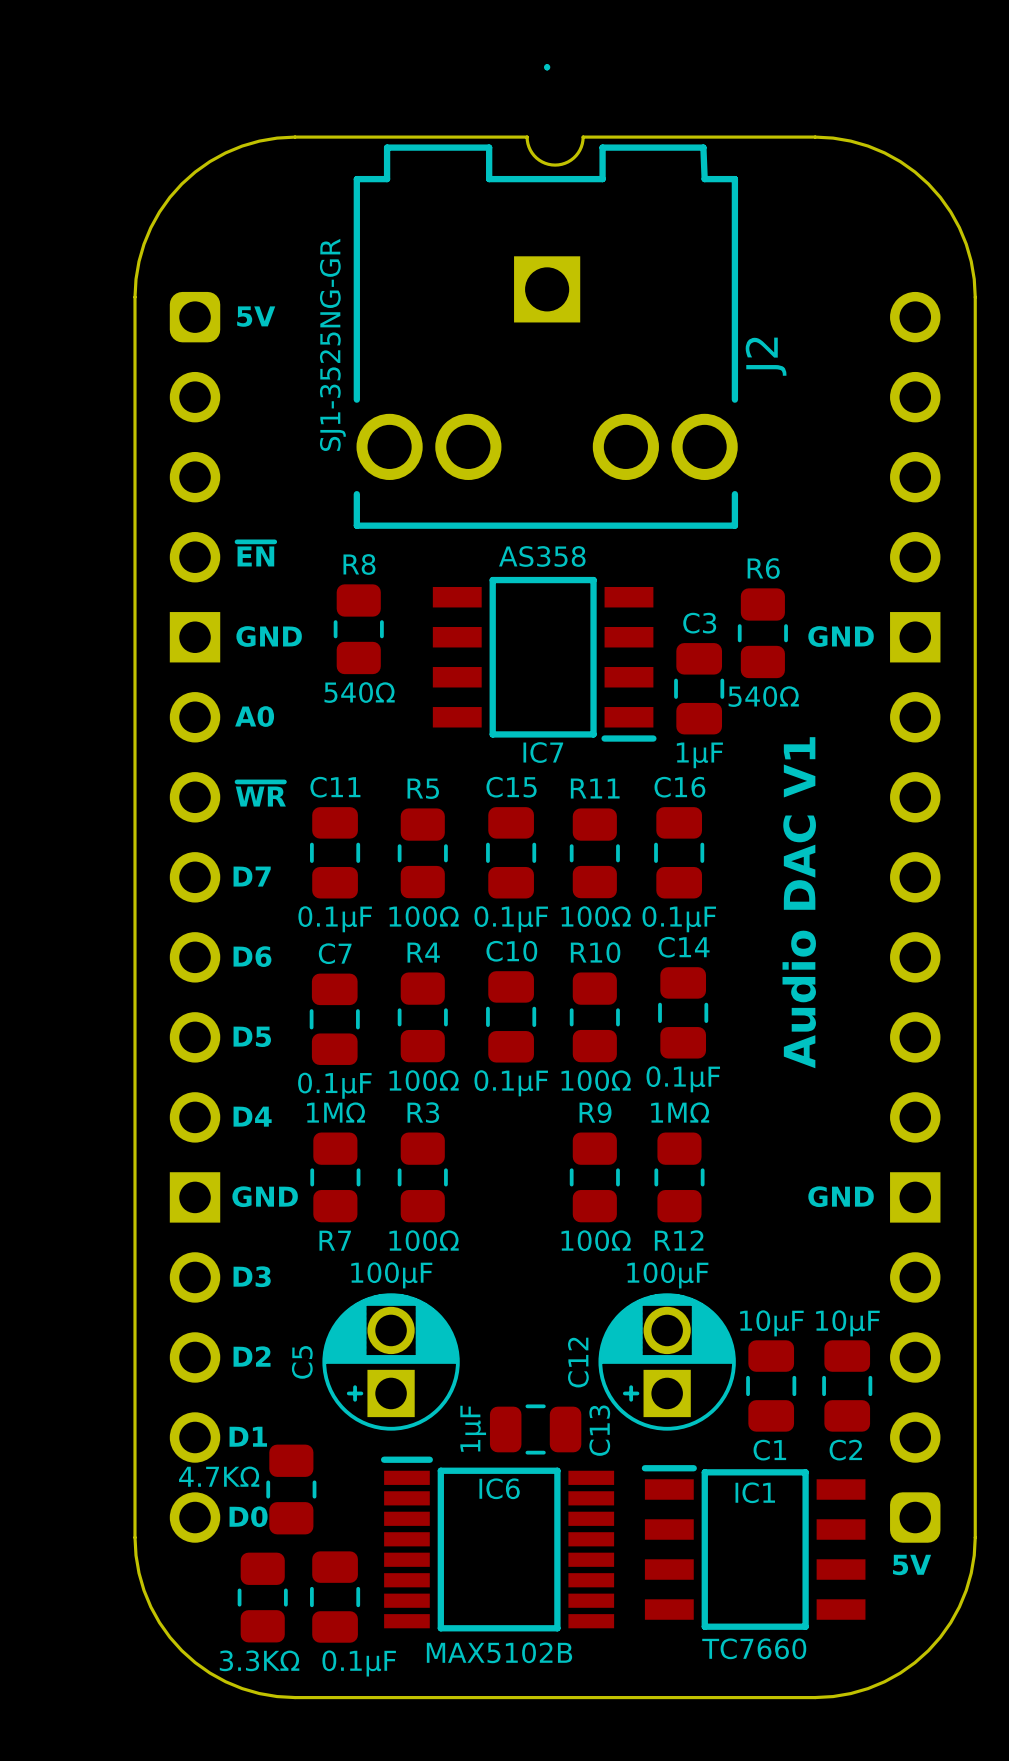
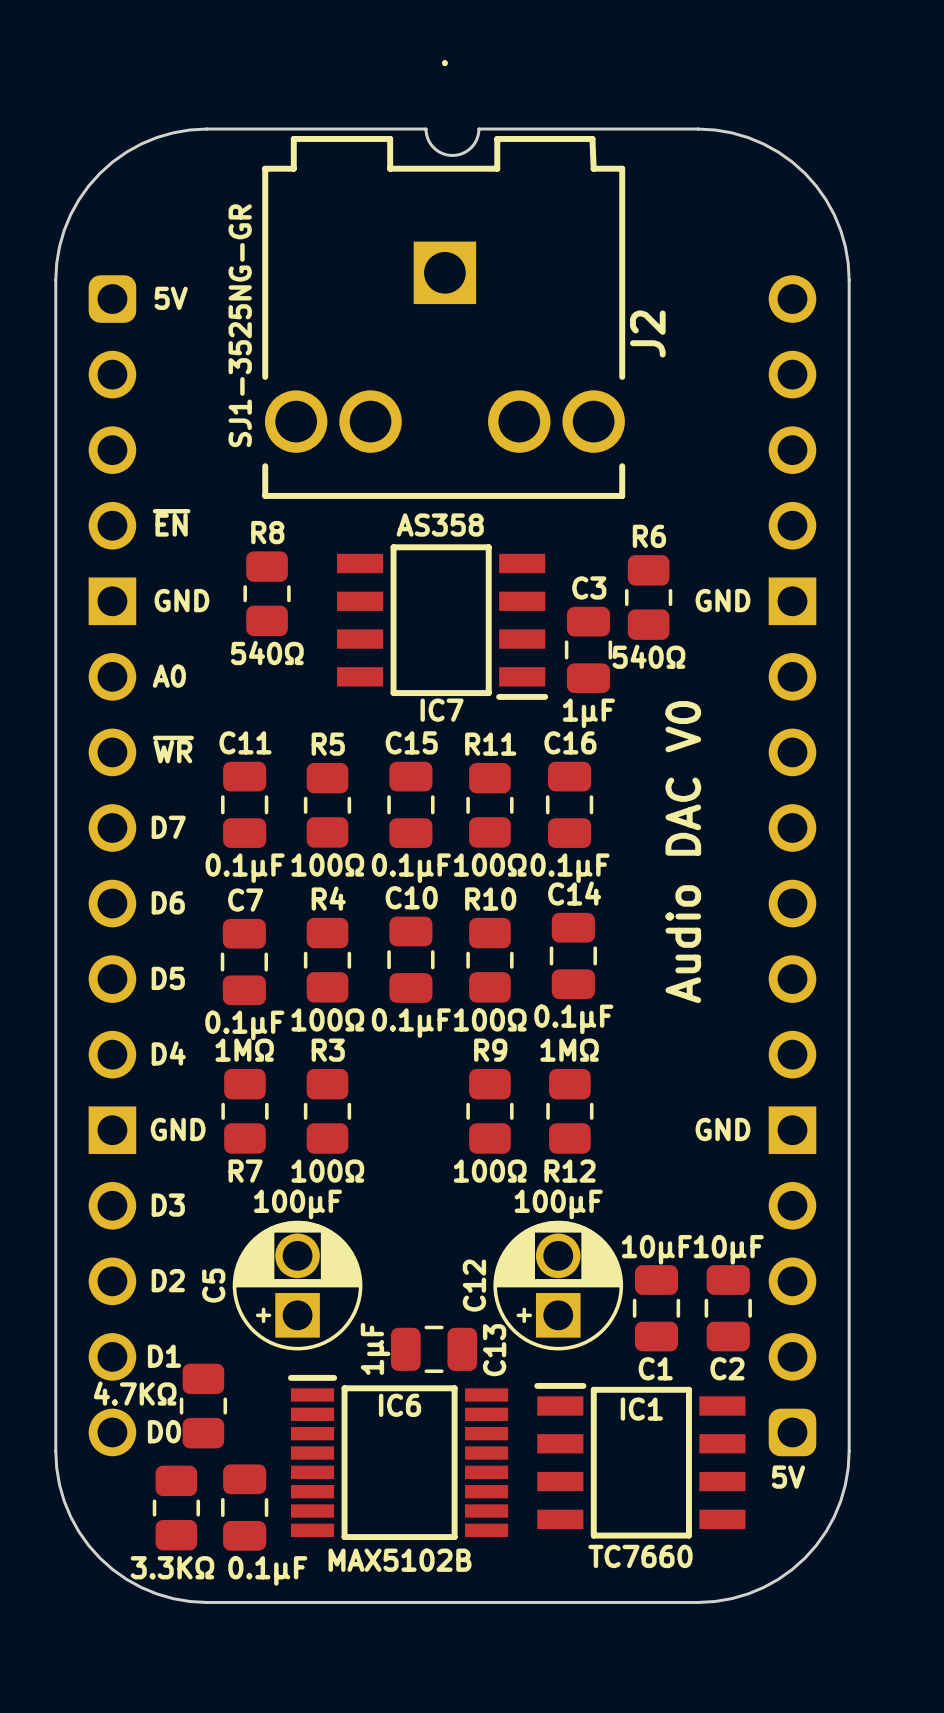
text: Audio DAC V1 (799, 902) -> Audio DAC V0 (683, 852)

